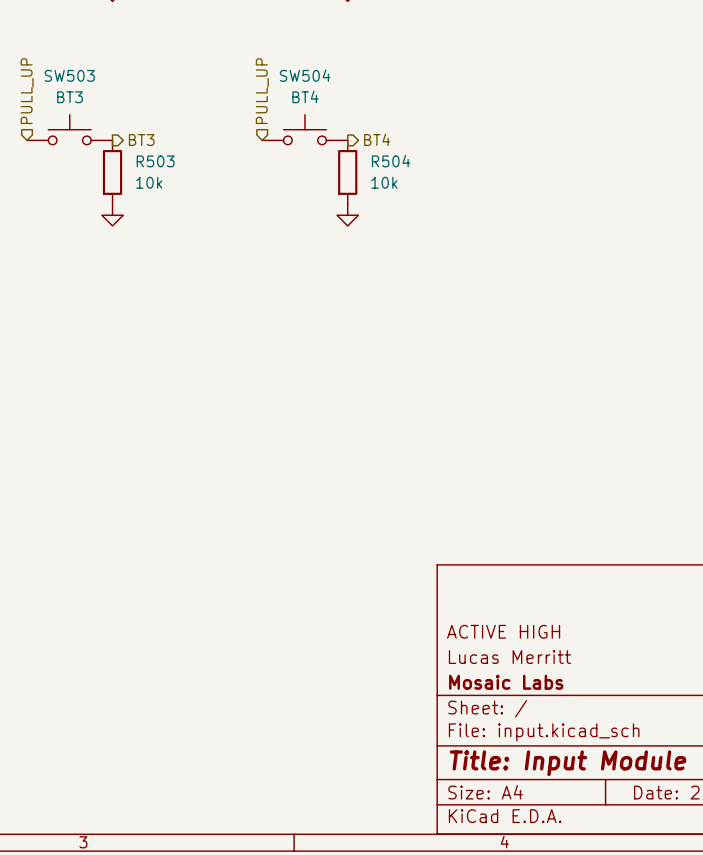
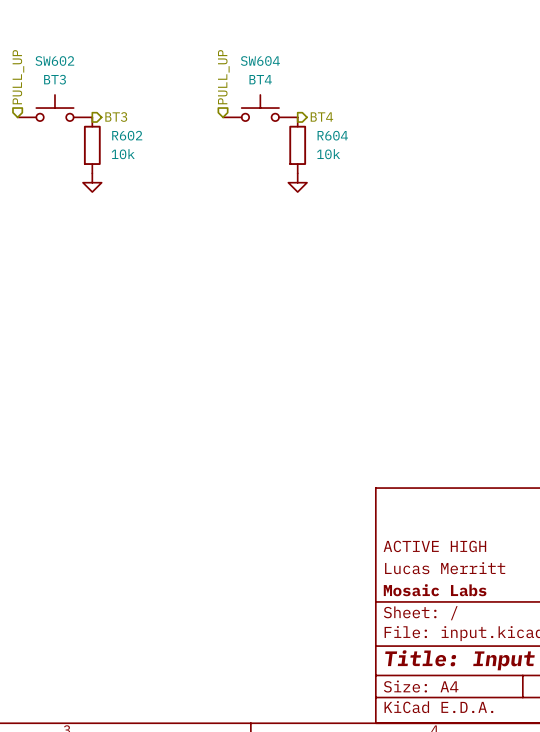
SW503 name: SW503 (69, 75) -> SW602 (54, 61)
SW504 name: SW504 (305, 75) -> SW604 (260, 61)
R503 name: R503 (155, 161) -> R602 (127, 135)
R504 name: R504 (391, 161) -> R604 (332, 135)

